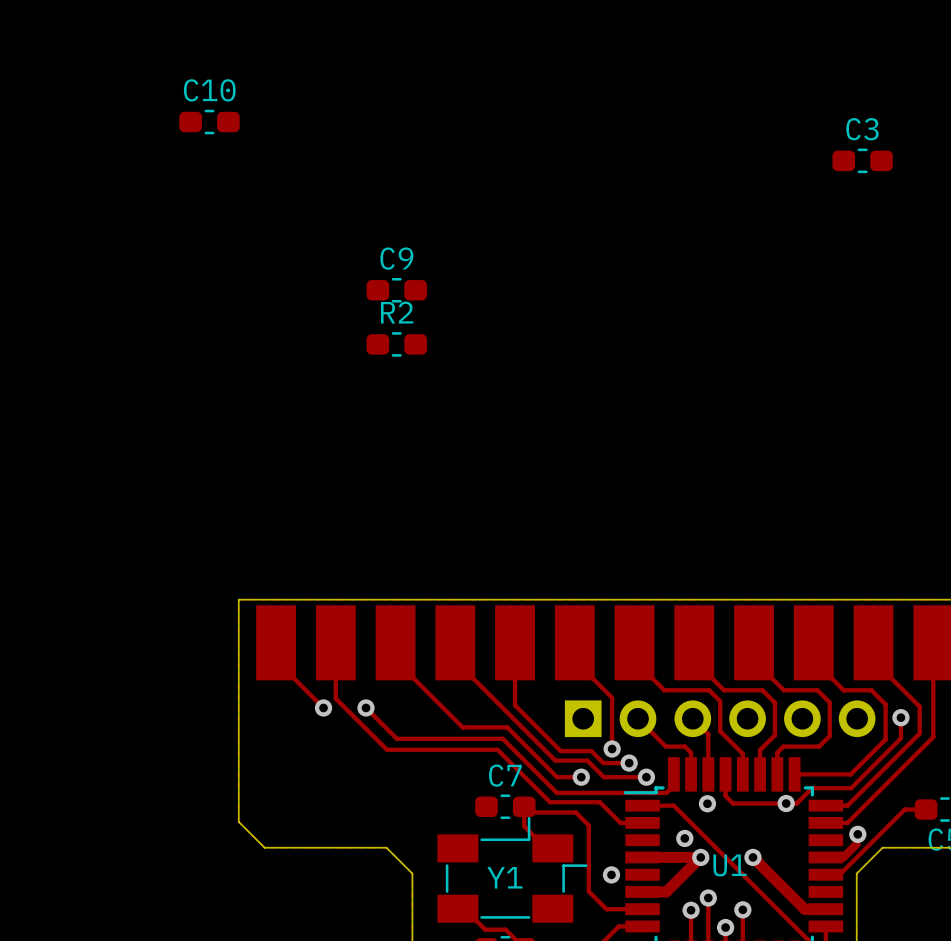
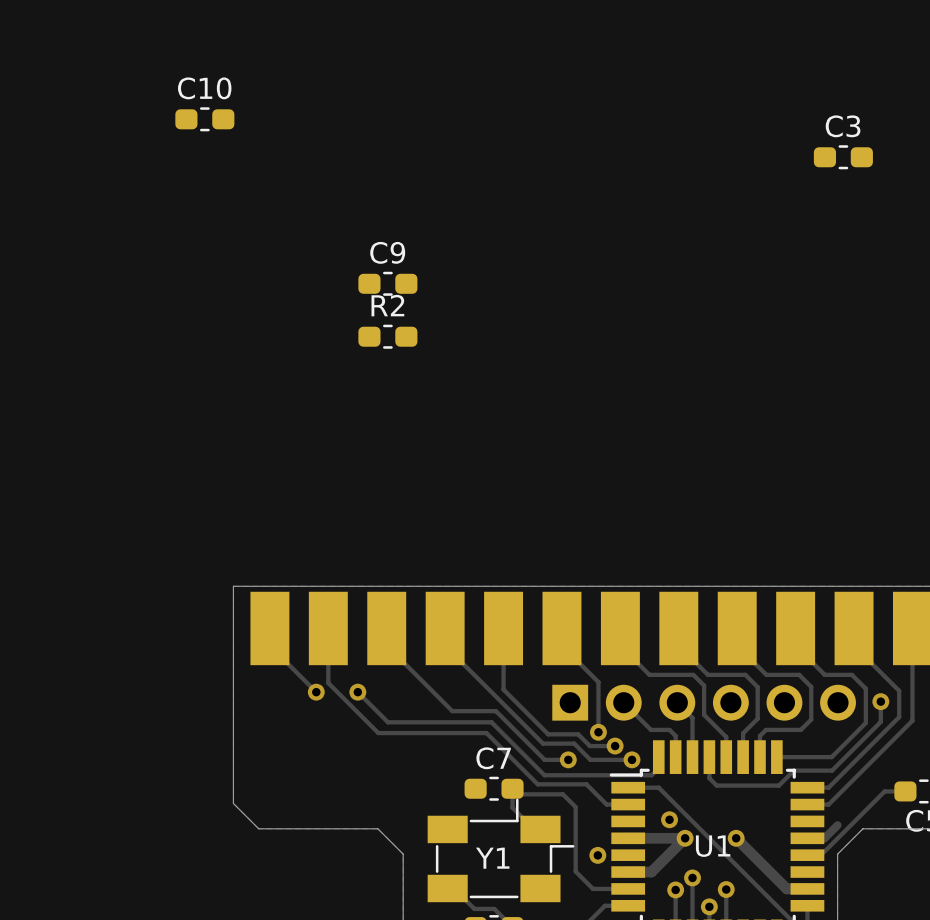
via: (707, 803) -> none
via: (786, 803) -> none
via: (857, 834) -> none

